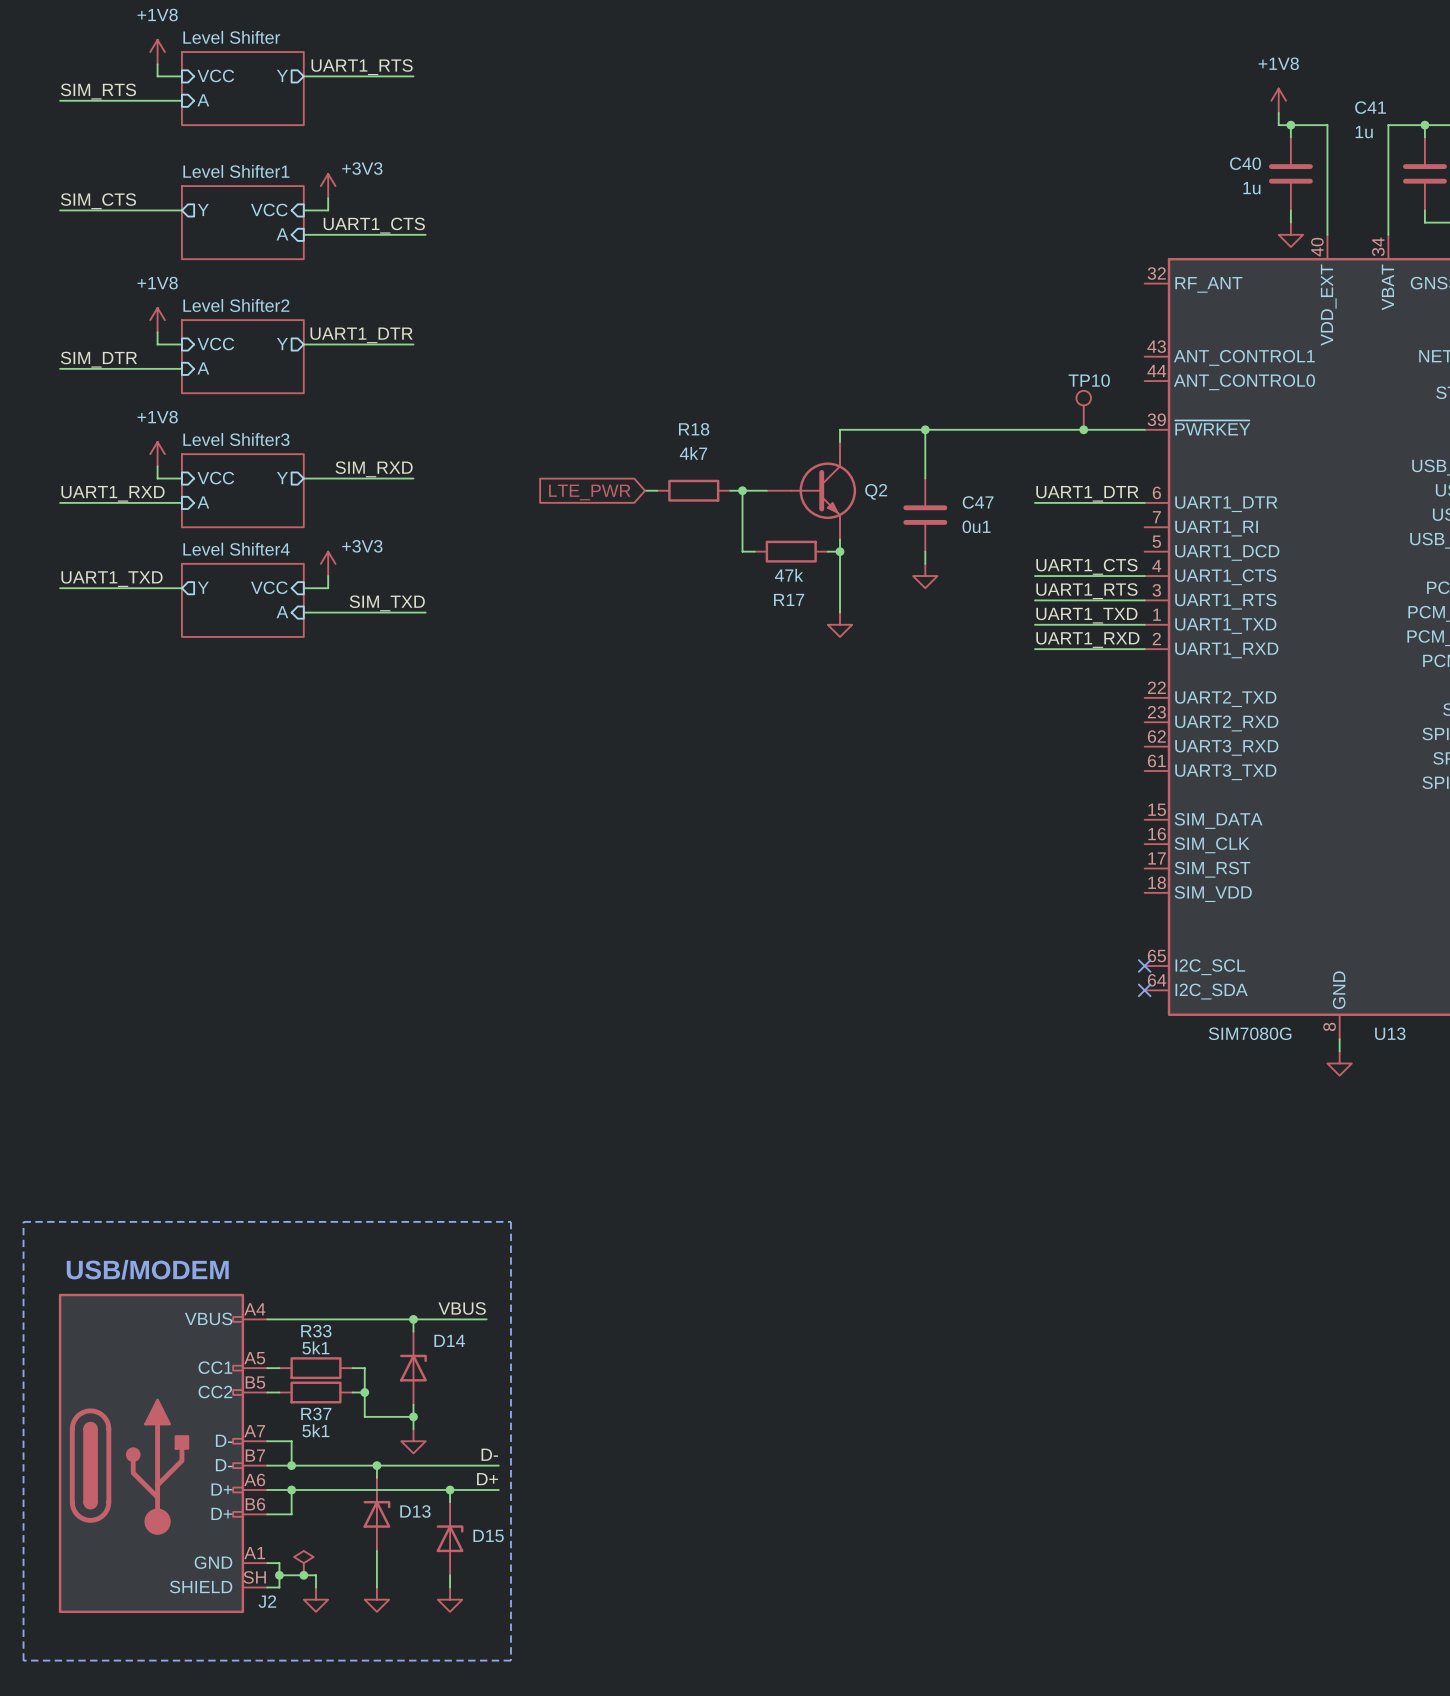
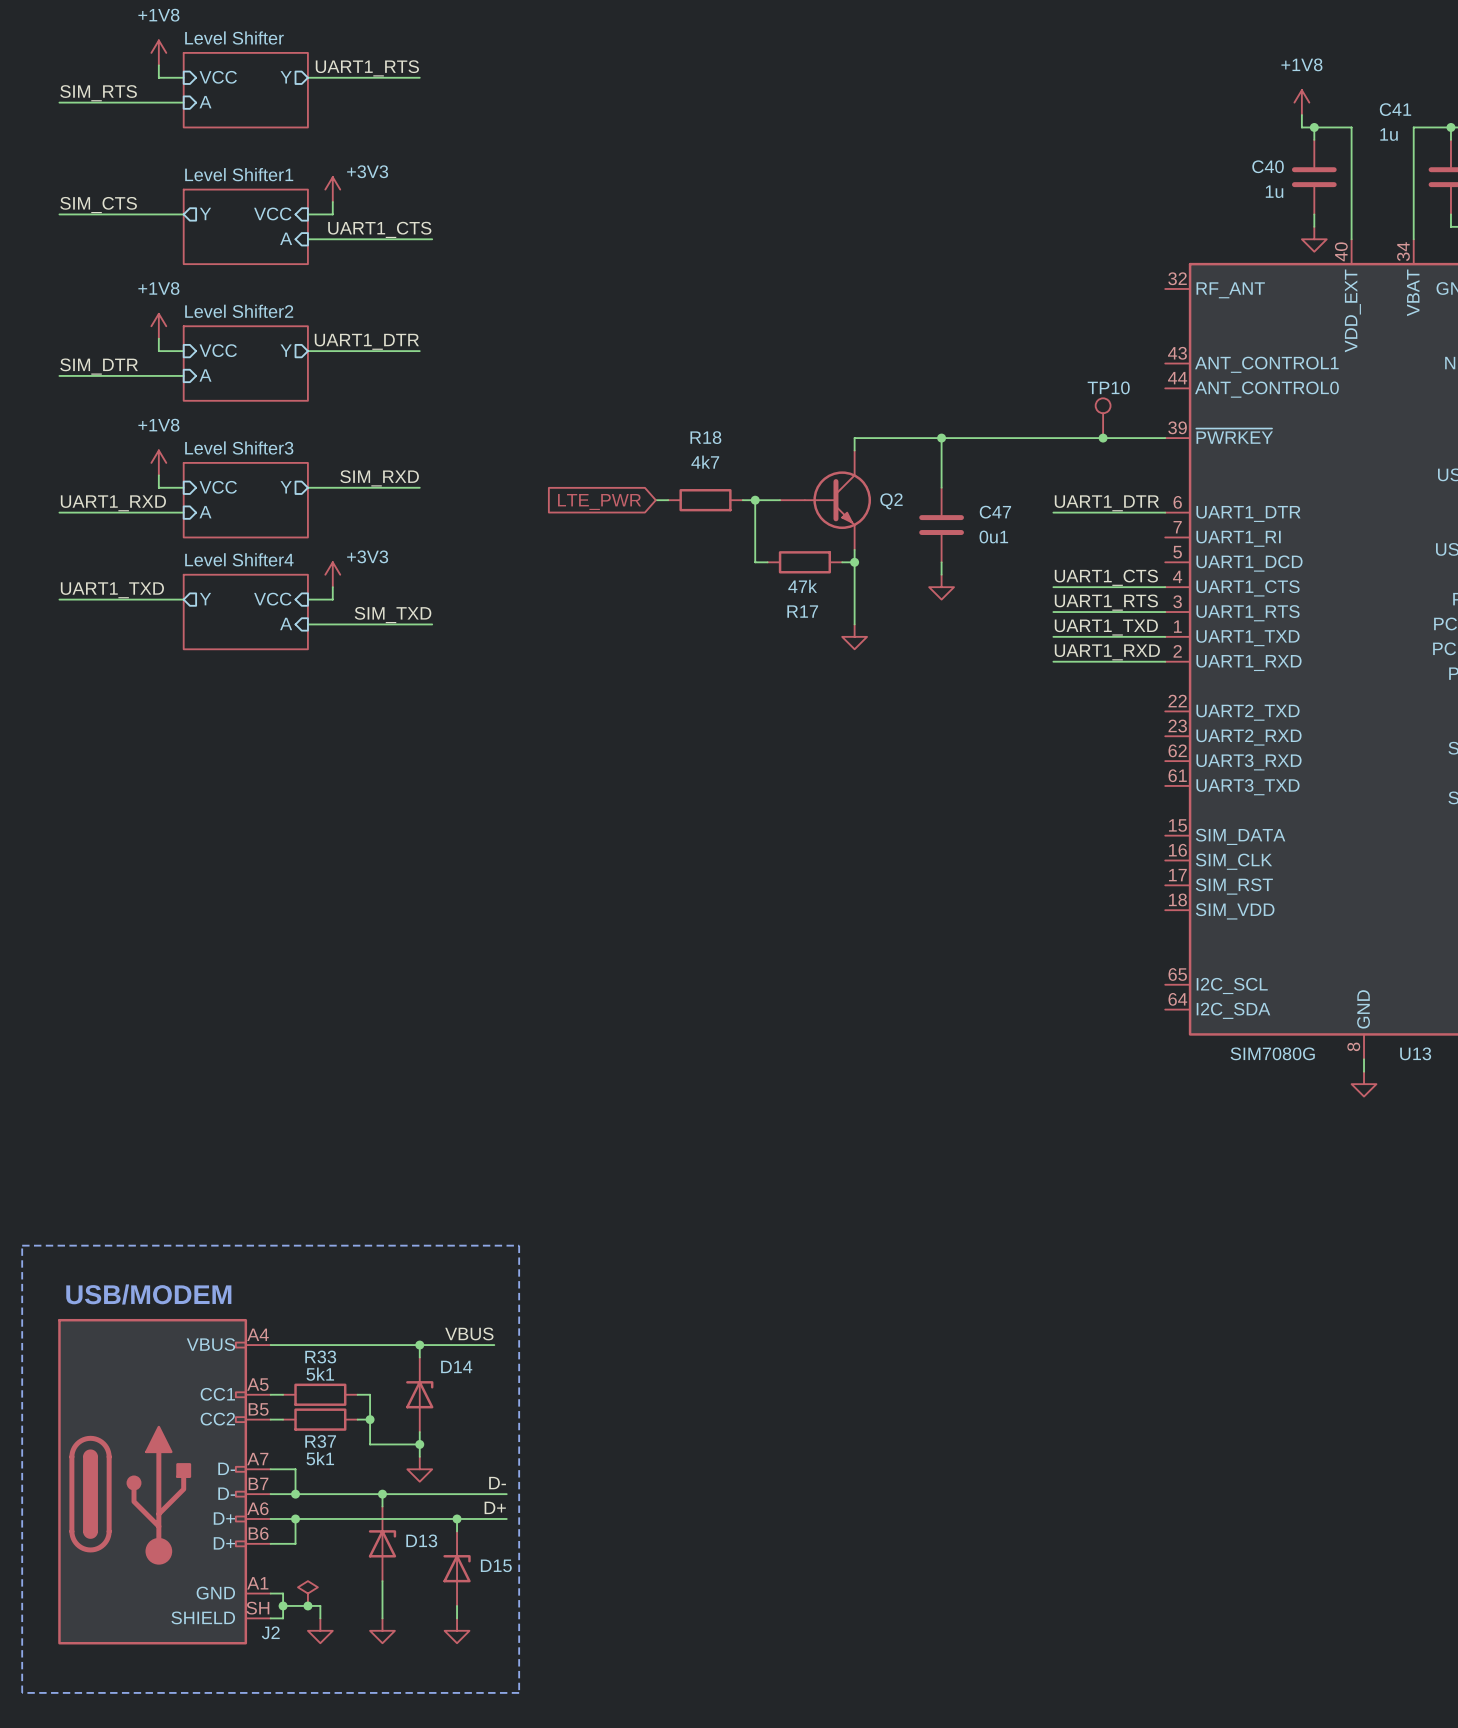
no-connect mark: (1144, 965) -> none
no-connect mark: (1144, 990) -> none

